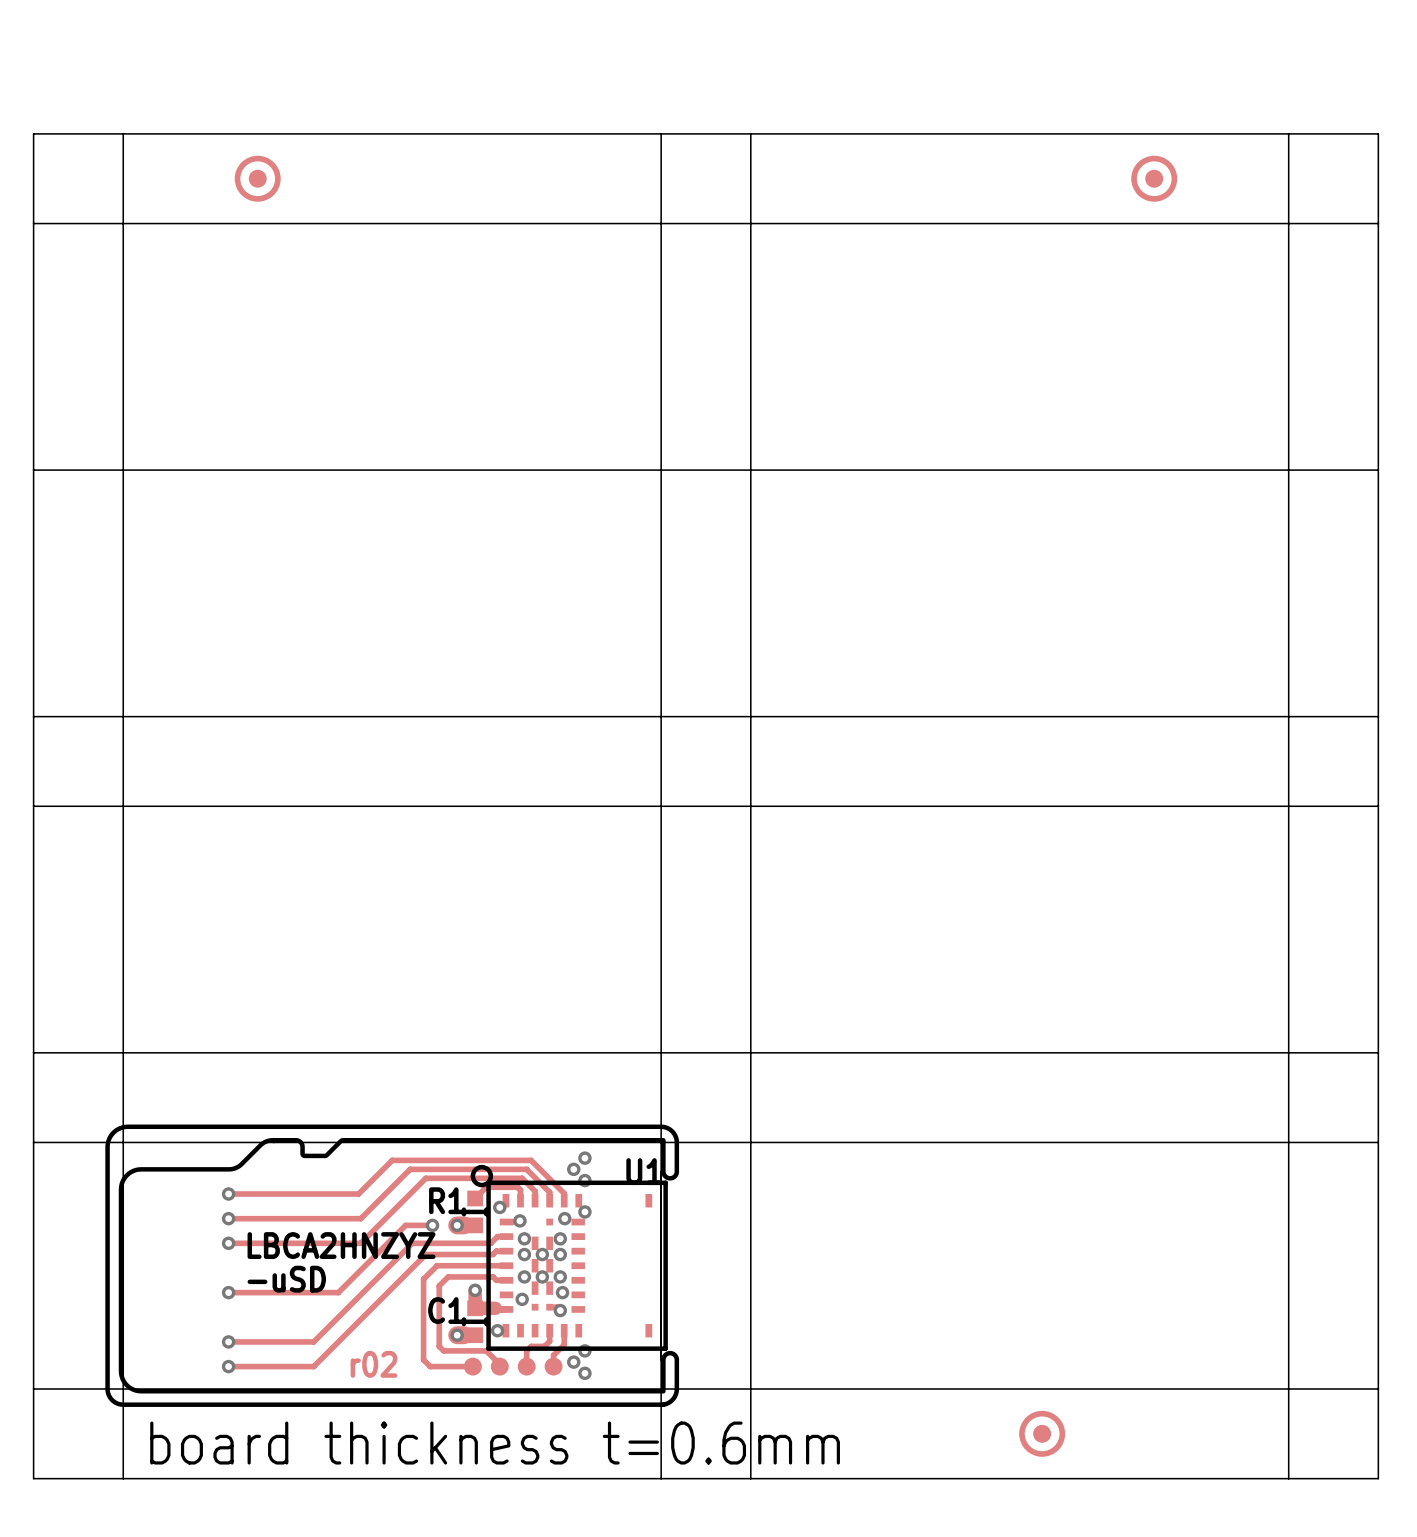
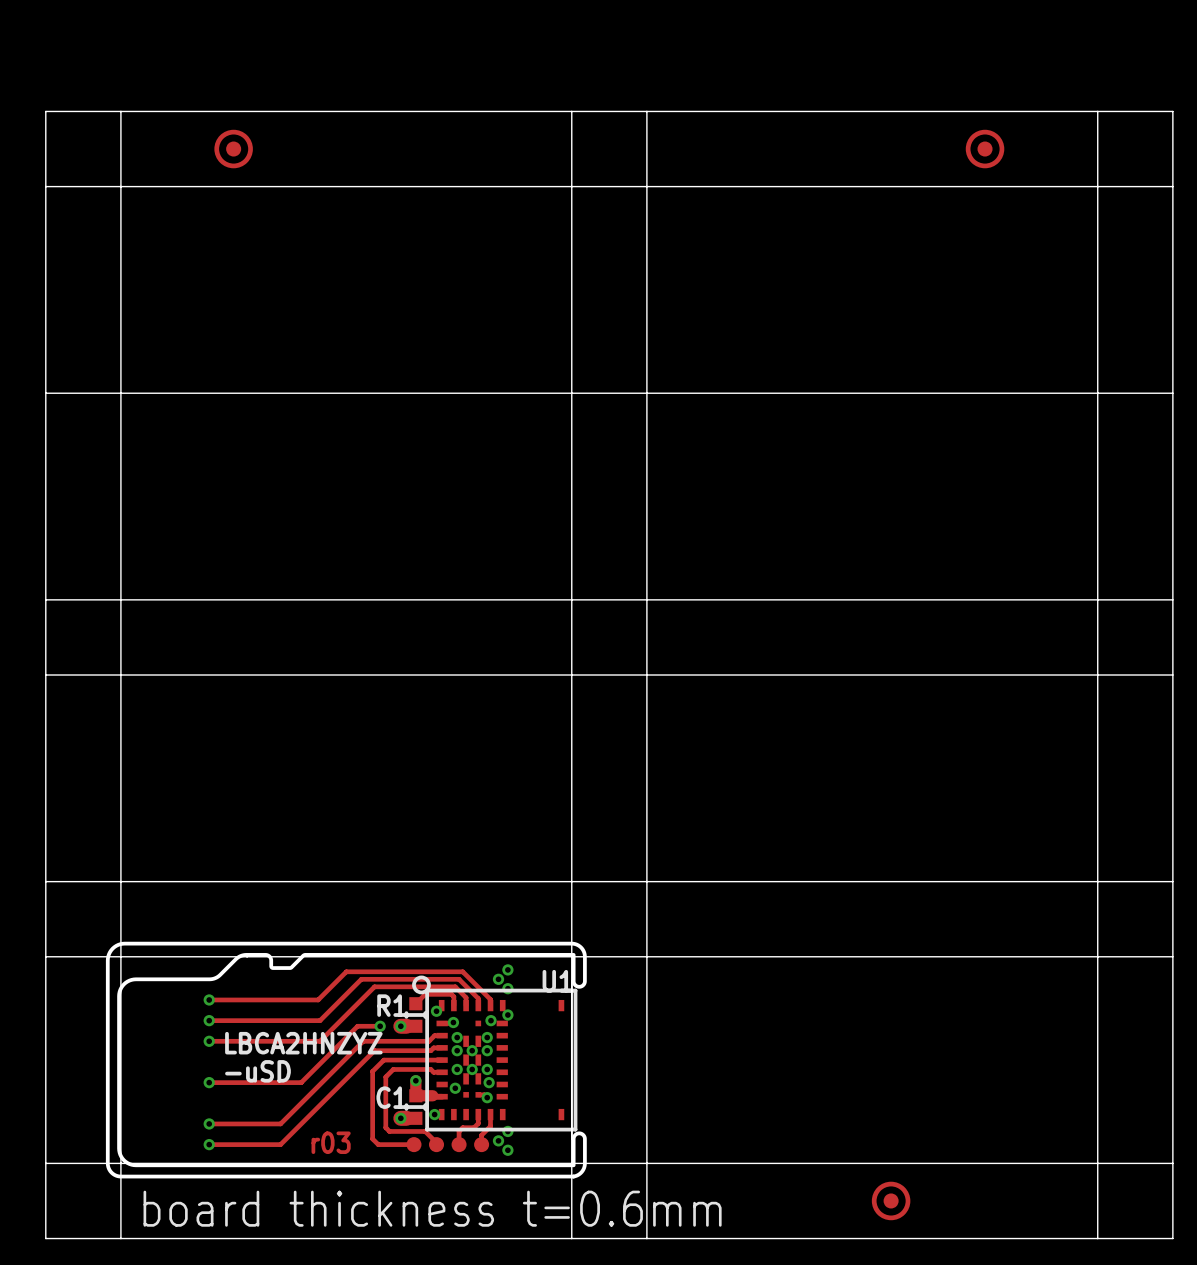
text: r02 (374, 1364) -> r03 (331, 1142)

